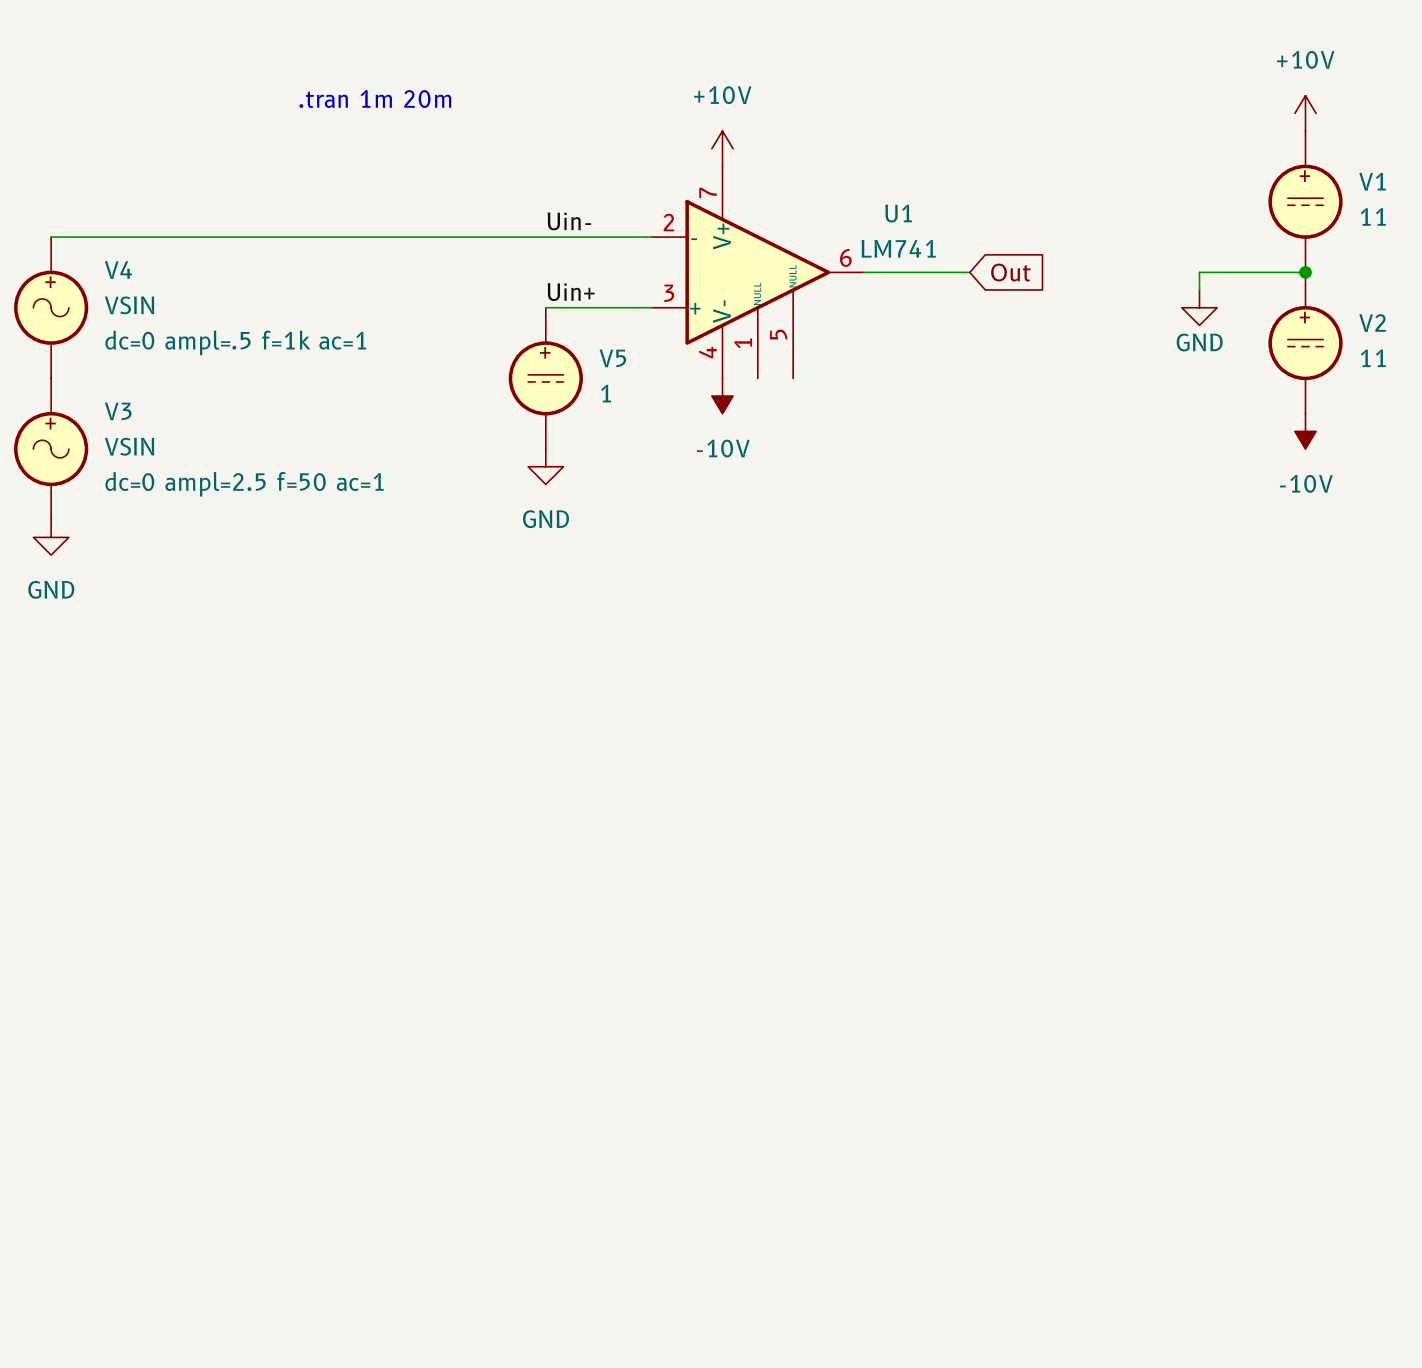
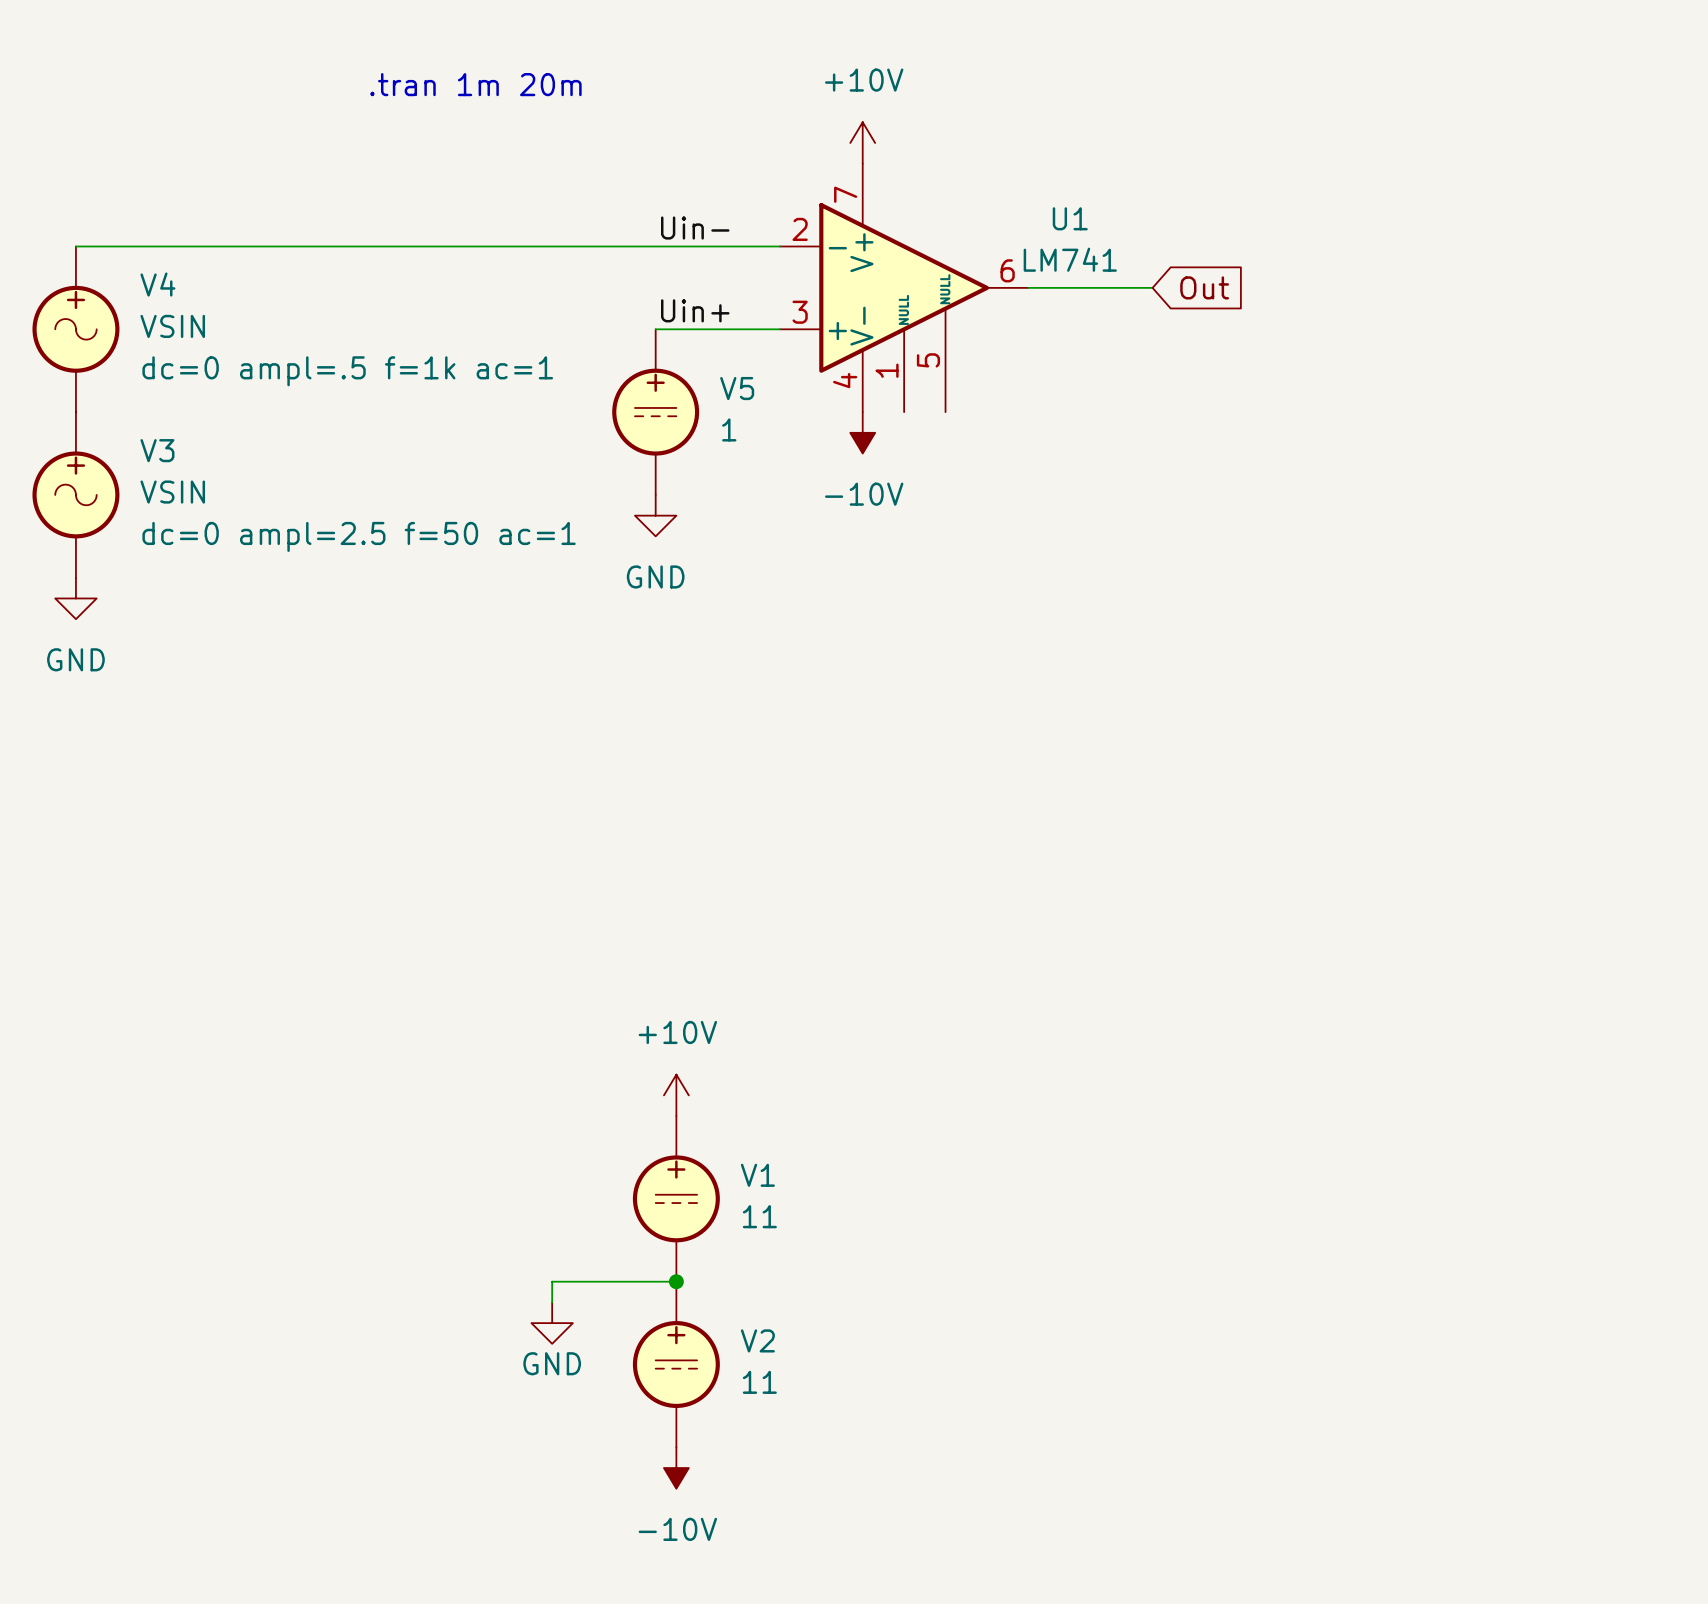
power symbol: +10V (1305, 113) -> none
V1 position: (1305, 201) -> (676, 1198)
wire: (1305, 272) (1199, 272) (1199, 290) -> none
junction: (1305, 272) -> none
power symbol: GND (1199, 307) -> none
V2 position: (1305, 343) -> (676, 1364)
power symbol: -10V (1305, 431) -> none
power symbol: none -> +10V (676, 1095)
wire: none -> (676, 1281) (552, 1281) (552, 1302)
junction: none -> (676, 1281)
power symbol: none -> GND (552, 1323)
power symbol: none -> -10V (676, 1468)

